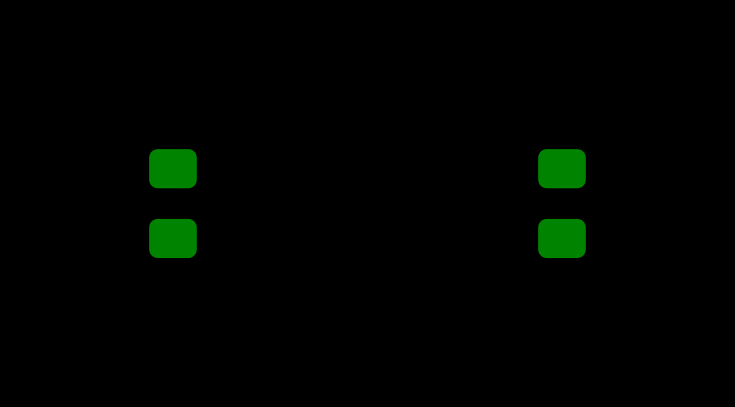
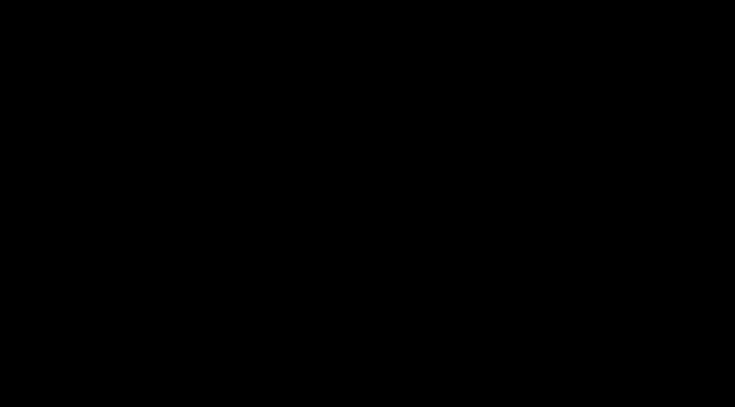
part: (172, 203) -> none
part: (561, 203) -> none

